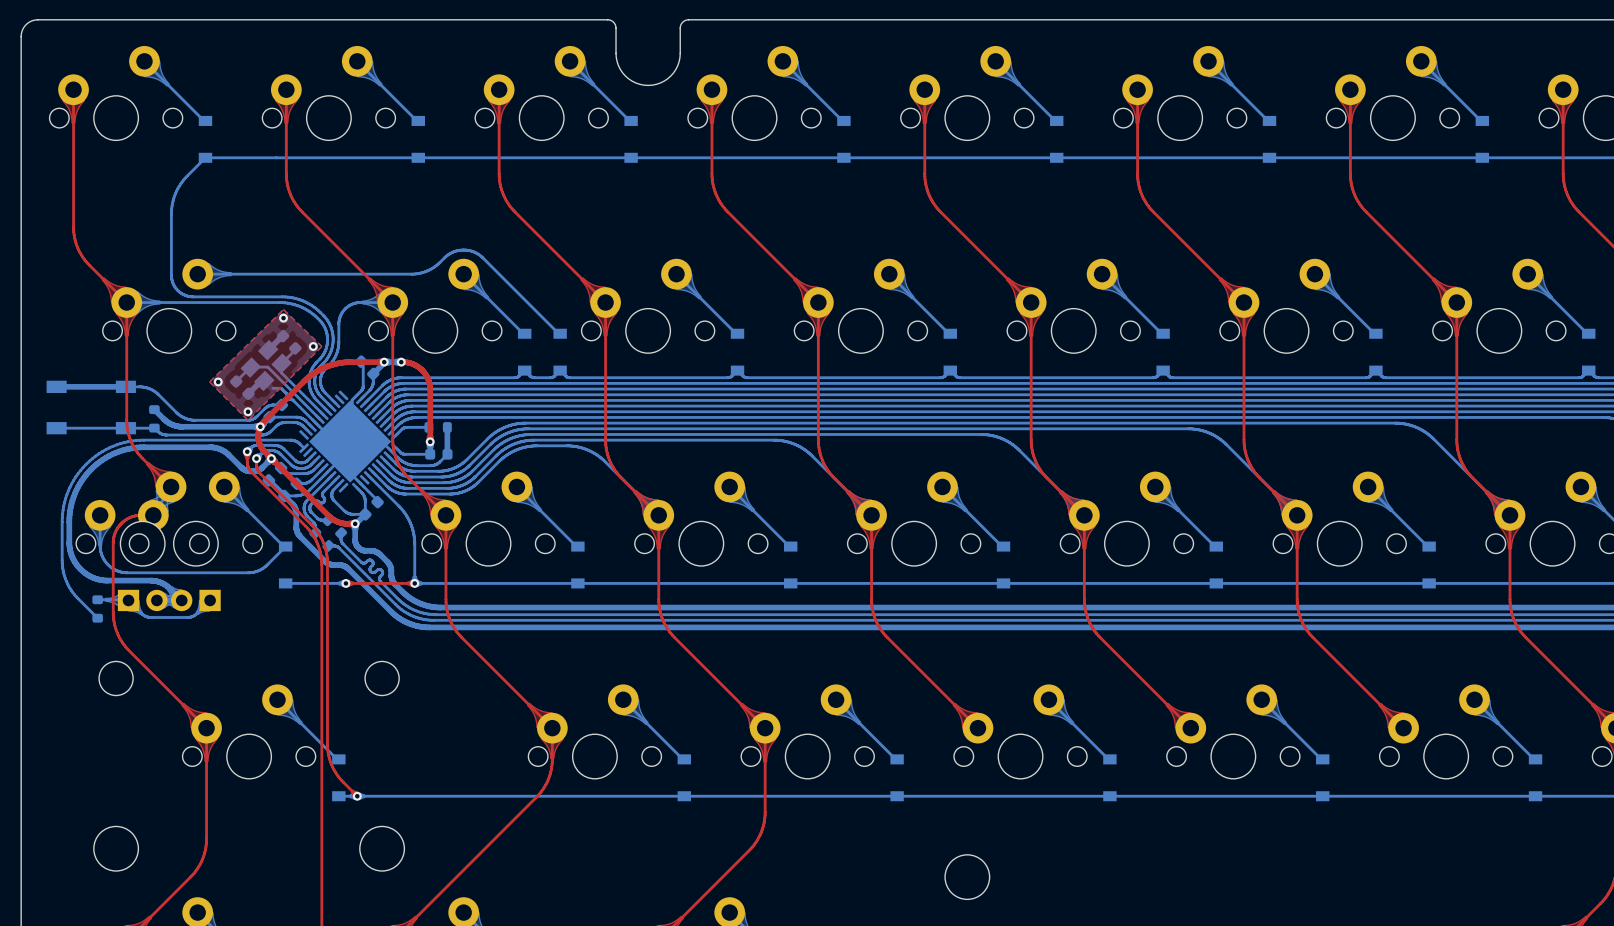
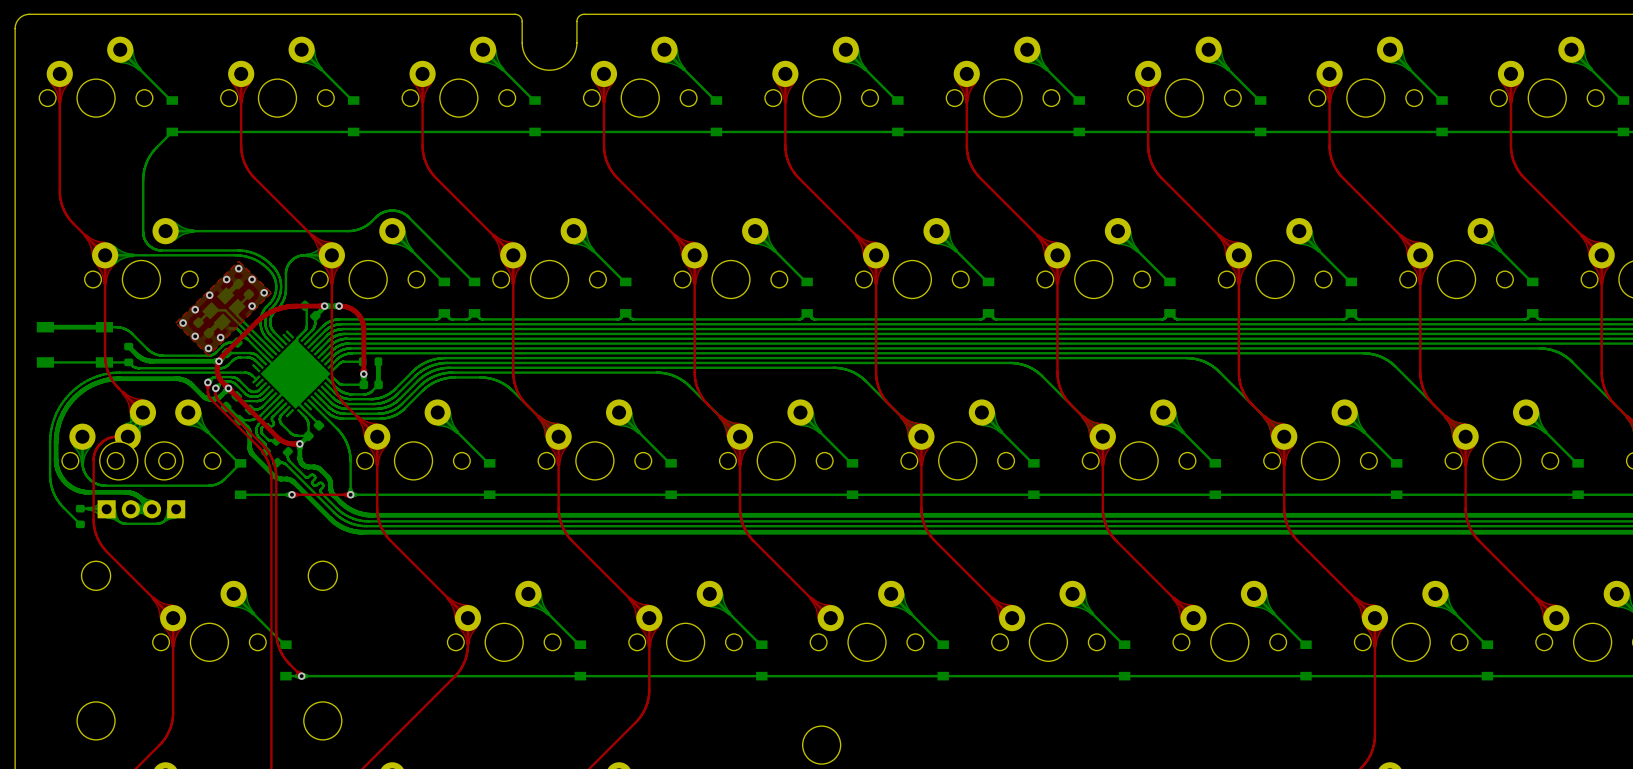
via: none -> (226, 279)
via: none -> (252, 279)
via: none -> (209, 295)
via: none -> (252, 306)
via: none -> (195, 309)
via: none -> (195, 336)
via: none -> (220, 337)

